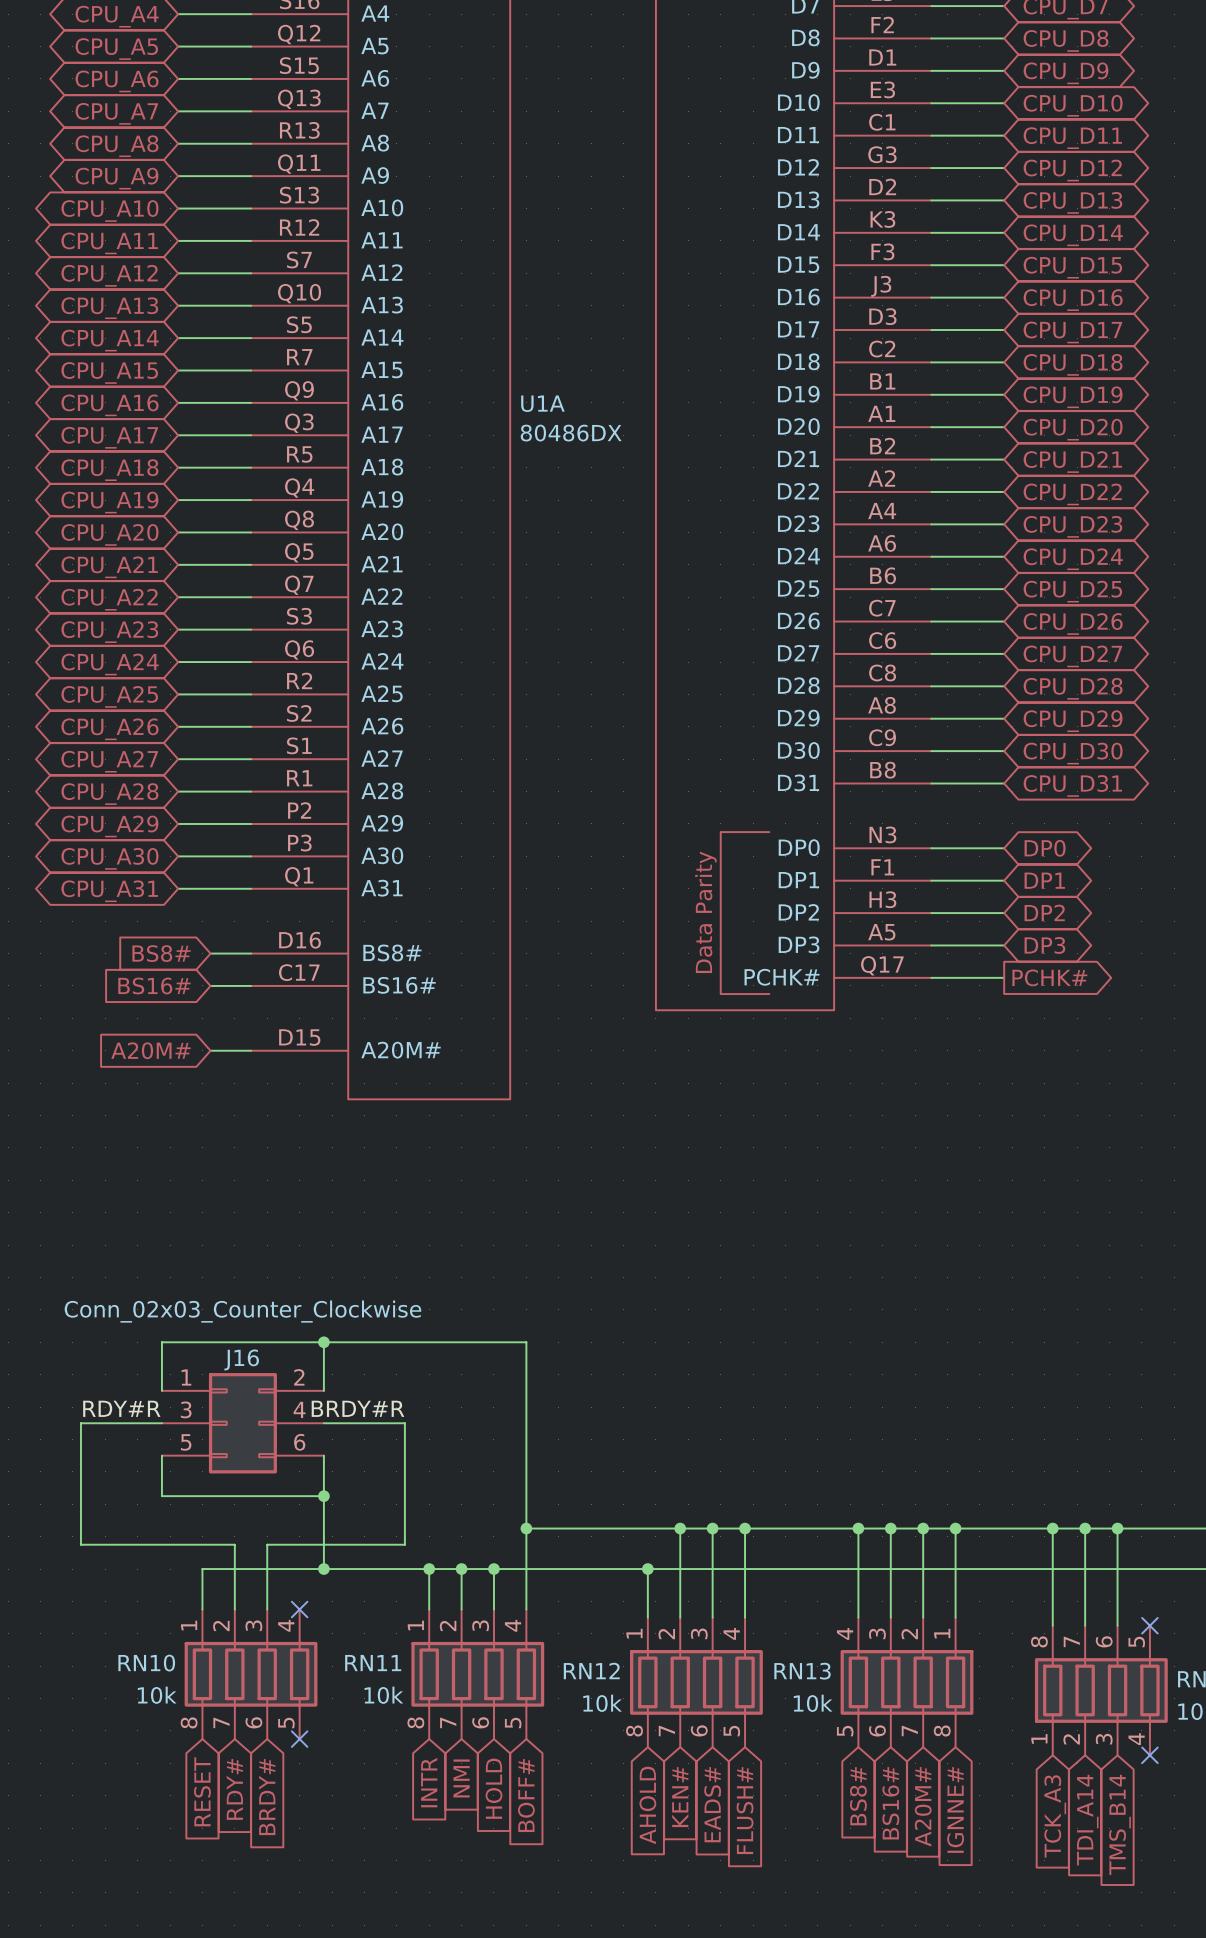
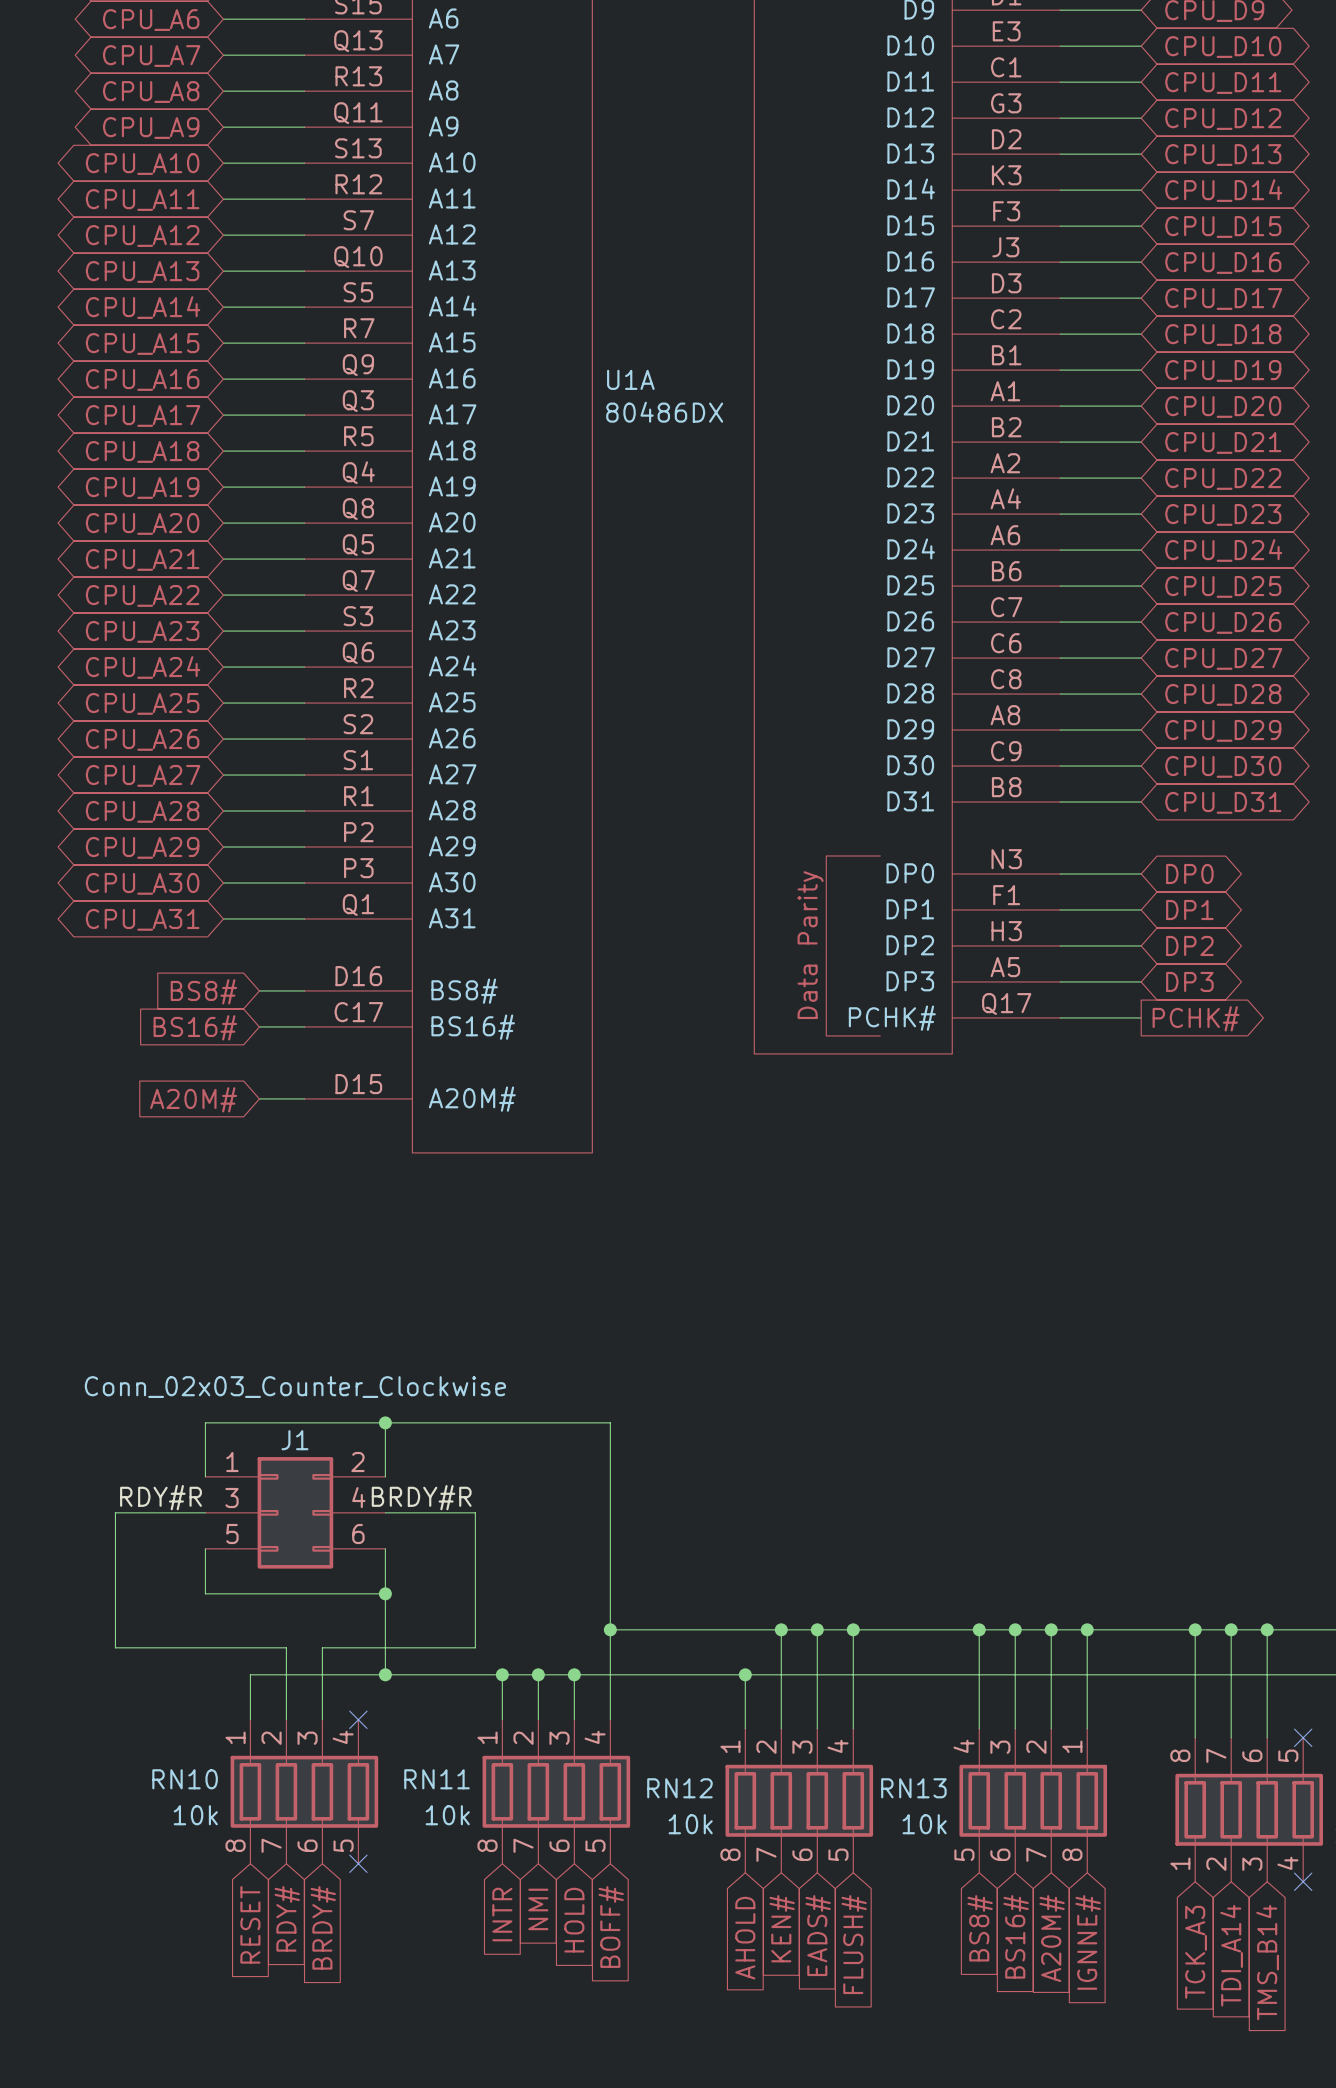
J16 name: J16 (241, 1359) -> J1 (294, 1440)

